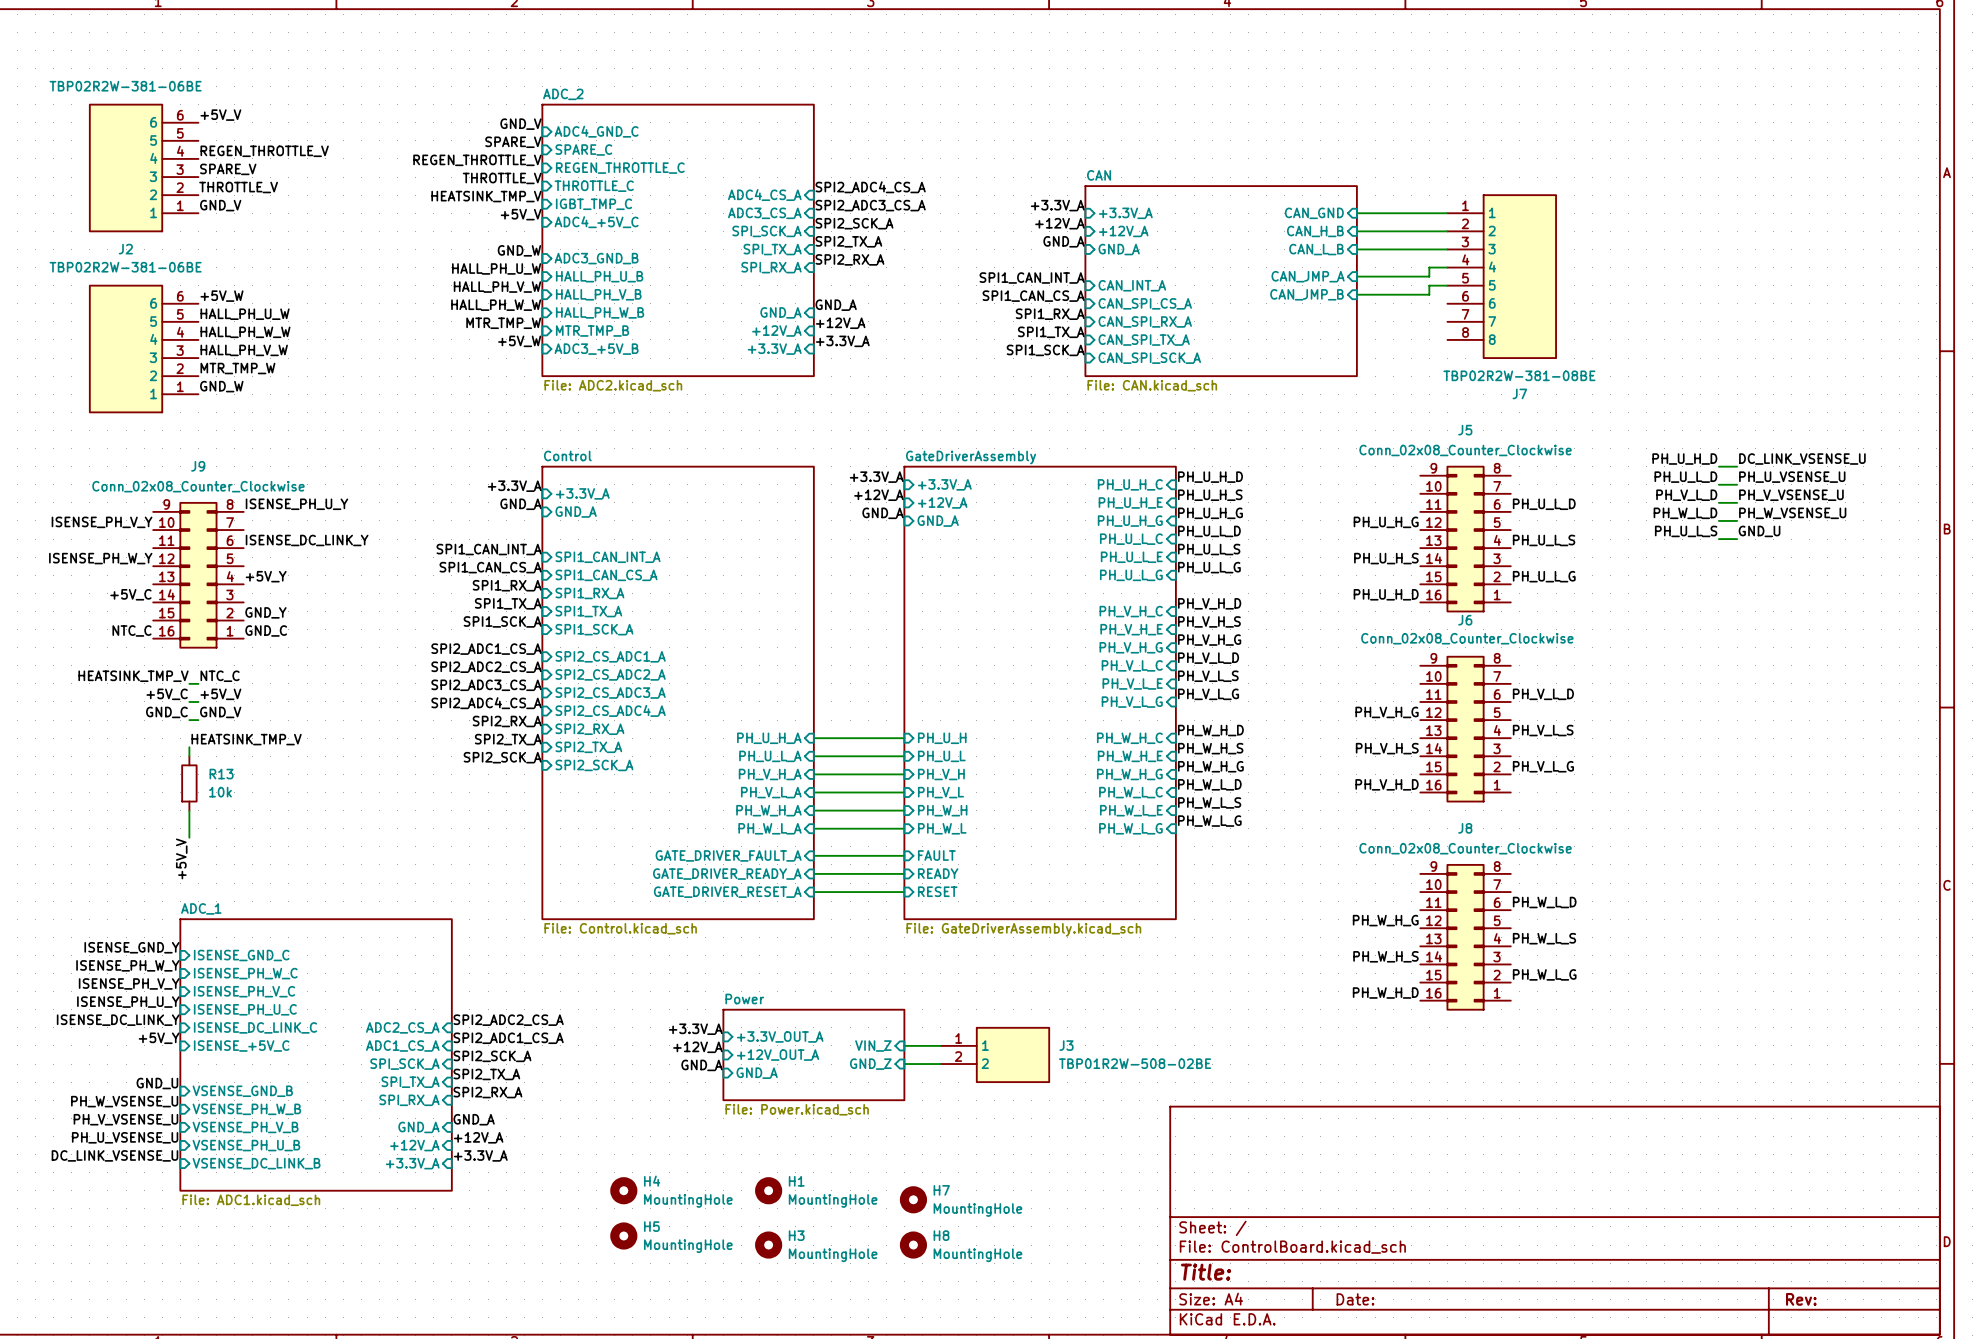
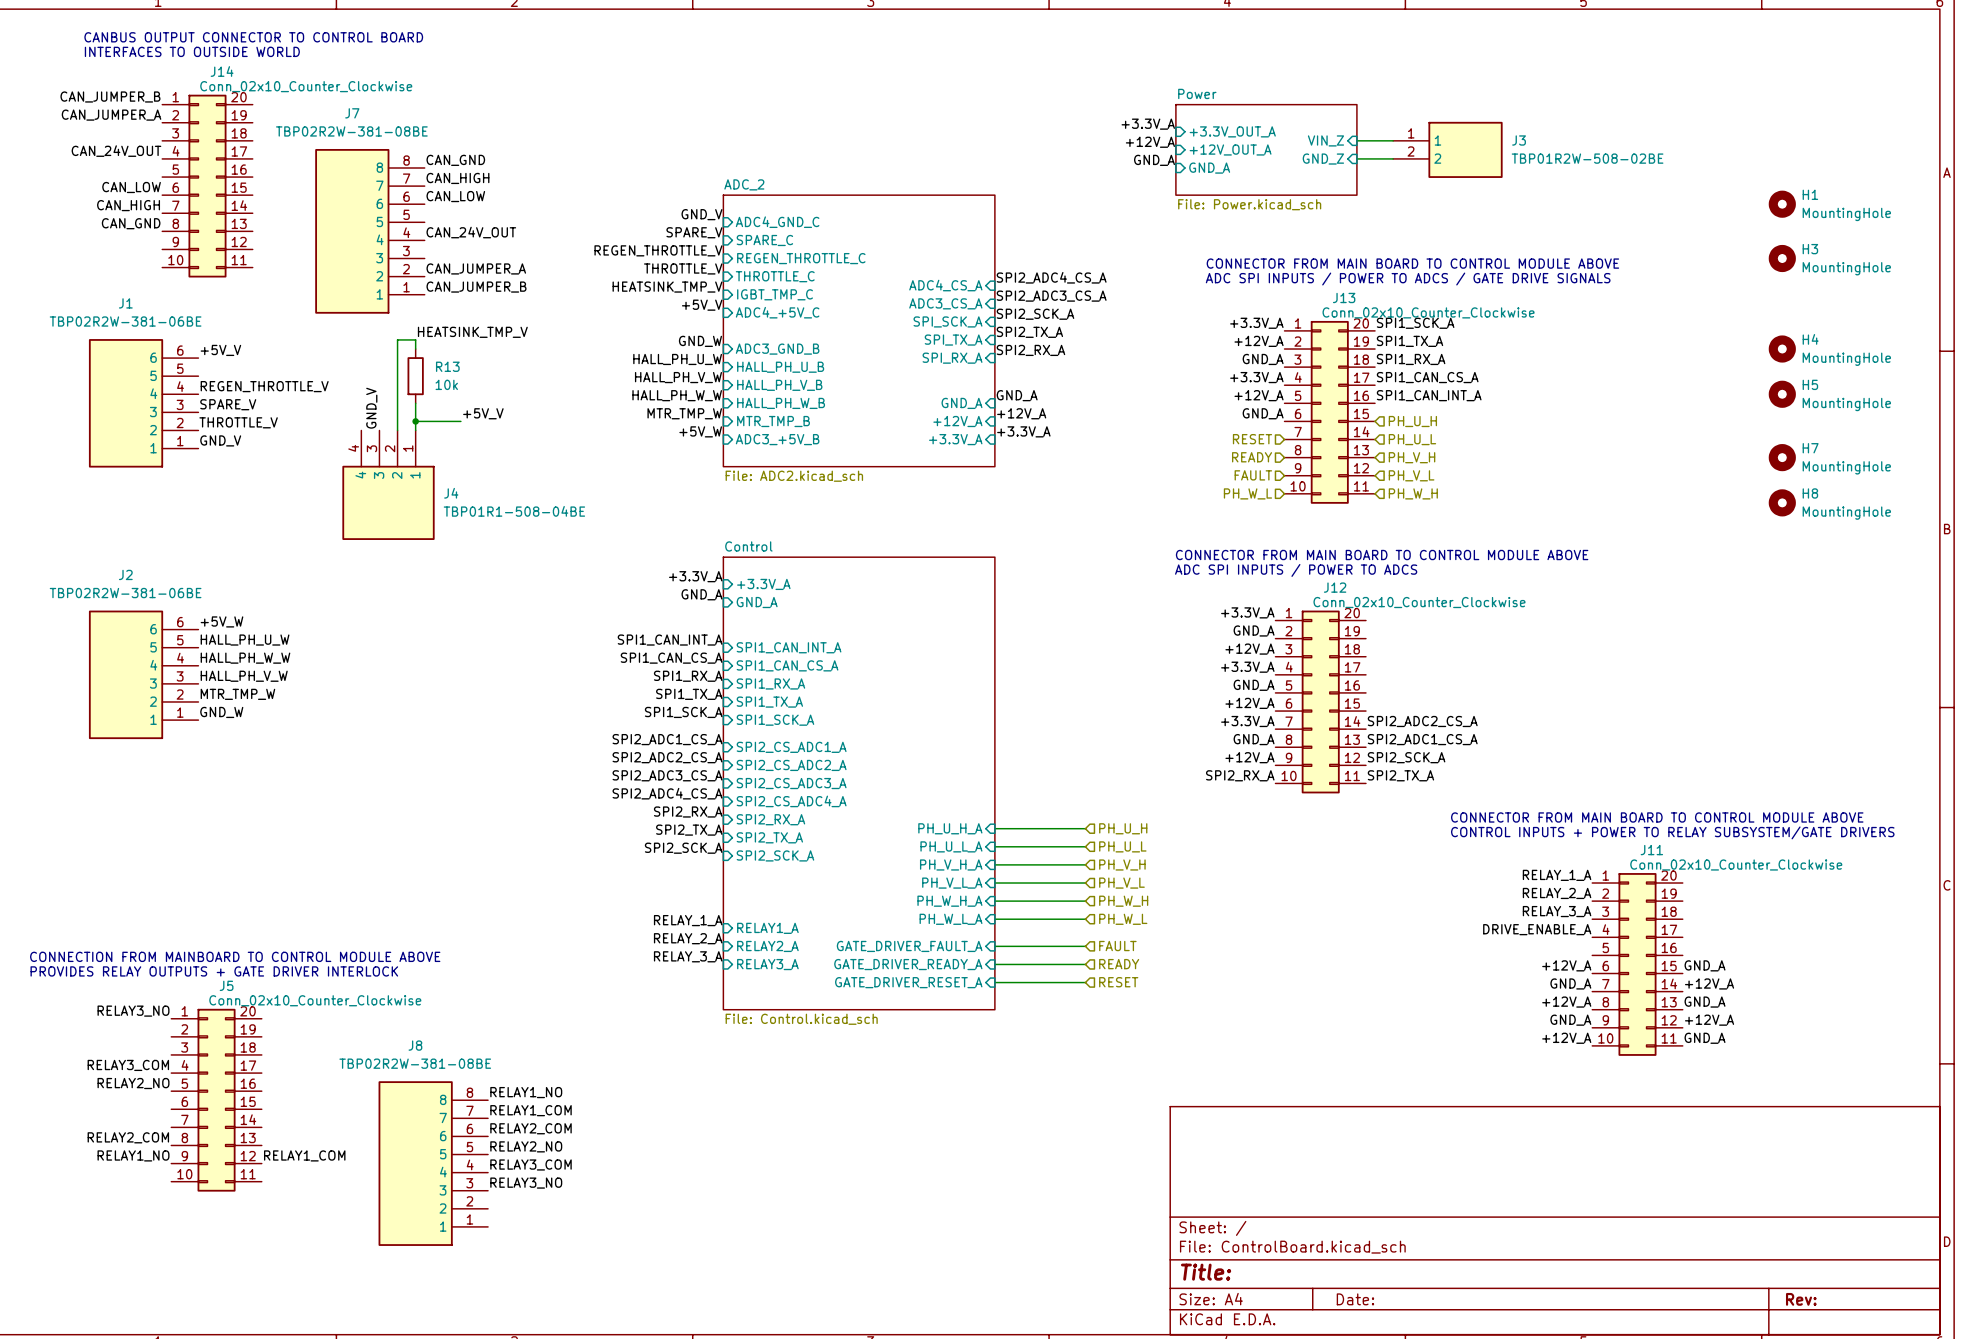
text: none -> CANBUS OUTPUT CONNECTOR TO CONTROL BOARD (253, 37)
text: none -> INTERFACES TO OUTSIDE WORLD (192, 51)
label: none -> CAN_JUMPER_B (110, 96)
label: none -> CAN_JUMPER_A (111, 115)
label: +5V_V (220, 115) -> none
label: GND_V (520, 124) -> none
label: none -> +3.3V_A (1148, 124)
sheet pin: ADC4_GND_C (596, 131) -> none
sheet pin: none -> +3.3V_OUT_A (1232, 131)
sheet pin: none -> VIN_Z (1325, 140)
wire: none -> (1356, 140) (1393, 140)
label: SPARE_V (513, 142) -> none
label: none -> +12V_A (1150, 142)
sheet pin: SPARE_C (583, 149) -> none
sheet pin: none -> +12V_OUT_A (1230, 149)
sheet Power: none -> File: Power.kicad_sch (1266, 149)
label: none -> CAN_24V_OUT (116, 151)
label: REGEN_THROTTLE_V (264, 151) -> none
wire: none -> (1356, 158) (1393, 158)
sheet pin: none -> GND_Z (1323, 159)
label: none -> CAN_GND (455, 160)
label: REGEN_THROTTLE_V (477, 160) -> none
label: none -> GND_A (1154, 160)
part: TBP02R2W-381-06BE (143, 167) -> none
sheet pin: REGEN_THROTTLE_C (620, 168) -> none
sheet pin: none -> GND_A (1209, 168)
label: SPARE_V (228, 169) -> none
label: none -> CAN_HIGH (457, 178)
label: THROTTLE_V (502, 178) -> none
J14: none -> Conn_02x10_Counter_Clockwise (207, 186)
sheet pin: THROTTLE_C (594, 186) -> none
label: none -> CAN_LOW (131, 187)
label: THROTTLE_V (238, 187) -> none
label: SPI2_ADC4_CS_A (870, 187) -> none
sheet pin: ADC4_CS_A (764, 195) -> none
label: none -> CAN_LOW (455, 196)
label: HEATSINK_TMP_V (486, 196) -> none
sheet pin: IGBT_TMP_C (594, 204) -> none
label: none -> CAN_HIGH (128, 205)
label: GND_V (220, 205) -> none
label: SPI2_ADC3_CS_A (870, 205) -> none
label: +3.3V_A (1057, 205) -> none
sheet pin: ADC3_CS_A (764, 213) -> none
sheet pin: +3.3V_A (1125, 213) -> none
sheet pin: CAN_GND (1314, 213) -> none
wire: (1356, 213) (1447, 213) -> none
label: +5V_V (521, 214) -> none
label: none -> GND_V (701, 214)
sheet pin: ADC4_+5V_C (596, 222) -> none
sheet pin: none -> ADC4_GND_C (777, 222)
label: none -> CAN_GND (131, 223)
label: SPI2_SCK_A (854, 223) -> none
label: +12V_A (1059, 223) -> none
sheet pin: SPI_SCK_A (766, 231) -> none
sheet pin: +12V_A (1123, 231) -> none
sheet pin: CAN_H_B (1315, 231) -> none
wire: (1356, 231) (1447, 231) -> none
label: none -> CAN_24V_OUT (471, 232)
label: none -> SPARE_V (694, 232)
sheet ADC_2 position: (678, 240) -> (859, 330)
sheet pin: none -> SPARE_C (764, 240)
label: SPI2_TX_A (848, 241) -> none
label: GND_A (1064, 241) -> none
sheet pin: SPI_TX_A (772, 249) -> none
sheet pin: GND_A (1119, 249) -> none
sheet pin: CAN_L_B (1316, 249) -> none
wire: (1356, 249) (1447, 249) -> none
label: GND_W (519, 250) -> none
label: none -> REGEN_THROTTLE_V (658, 250)
sheet pin: ADC3_GND_B (596, 258) -> none
sheet pin: none -> REGEN_THROTTLE_C (801, 258)
label: SPI2_RX_A (849, 259) -> none
text: none -> CONNECTOR FROM MAIN BOARD TO CONTROL MODULE ABOVE (1412, 263)
sheet pin: SPI_RX_A (771, 267) -> none
wire: (1447, 267) (1429, 267) (1429, 276) (1356, 276) -> none
label: none -> CAN_JUMPER_A (476, 268)
label: HALL_PH_U_W (496, 268) -> none
label: none -> THROTTLE_V (683, 268)
sheet pin: HALL_PH_U_B (599, 276) -> none
sheet pin: none -> THROTTLE_C (775, 276)
sheet pin: CAN_JMP_A (1308, 276) -> none
J7 position: (1502, 276) -> (369, 231)
J7 rotation: 0° (1519, 276) -> 180° (352, 231)
label: none -> SPI2_ADC4_CS_A (1051, 277)
label: SPI1_CAN_INT_A (1032, 278) -> none
text: none -> ADC SPI INPUTS / POWER TO ADCS / GATE DRIVE SIGNALS (1408, 279)
sheet CAN: File: CAN.kicad_sch (1221, 281) -> none
sheet pin: none -> ADC4_CS_A (945, 285)
sheet pin: CAN_INT_A (1132, 285) -> none
wire: (1447, 285) (1429, 285) (1429, 294) (1356, 294) -> none
label: none -> CAN_JUMPER_B (476, 287)
label: HALL_PH_V_W (497, 287) -> none
label: none -> HEATSINK_TMP_V (667, 287)
sheet pin: HALL_PH_V_B (598, 294) -> none
sheet pin: none -> IGBT_TMP_C (775, 294)
sheet pin: CAN_JMP_B (1307, 294) -> none
label: +5V_W (221, 296) -> none
label: SPI1_CAN_CS_A (1033, 296) -> none
label: none -> SPI2_ADC3_CS_A (1051, 296)
sheet pin: none -> ADC3_CS_A (945, 303)
sheet pin: CAN_SPI_CS_A (1145, 303) -> none
label: HALL_PH_W_W (496, 305) -> none
label: none -> +5V_V (702, 305)
label: GND_A (836, 305) -> none
sheet pin: HALL_PH_W_B (600, 312) -> none
sheet pin: none -> ADC4_+5V_C (777, 312)
sheet pin: GND_A (780, 312) -> none
label: HALL_PH_U_W (245, 314) -> none
label: none -> SPI2_SCK_A (1035, 314)
label: SPI1_RX_A (1050, 314) -> none
sheet pin: none -> SPI_SCK_A (947, 321)
sheet pin: CAN_SPI_RX_A (1145, 321) -> none
label: MTR_TMP_W (503, 323) -> none
label: +12V_A (840, 323) -> none
label: none -> +3.3V_A (1256, 323)
label: none -> SPI1_SCK_A (1415, 323)
sheet pin: MTR_TMP_B (592, 331) -> none
sheet pin: +12V_A (776, 331) -> none
label: HALL_PH_W_W (245, 332) -> none
label: none -> HEATSINK_TMP_V (472, 332)
label: none -> SPI2_TX_A (1029, 332)
label: SPI1_TX_A (1051, 332) -> none
sheet pin: none -> SPI_TX_A (953, 340)
sheet pin: CAN_SPI_TX_A (1144, 340) -> none
label: +5V_W (519, 341) -> none
label: none -> GND_W (700, 341)
label: +3.3V_A (842, 341) -> none
label: none -> +12V_A (1259, 341)
label: none -> SPI1_TX_A (1410, 341)
J2 position: (143, 349) -> (143, 674)
wire: none -> (415, 349) (415, 339) (397, 339) (397, 430)
sheet pin: ADC3_+5V_B (596, 349) -> none
sheet pin: +3.3V_A (774, 349) -> none
sheet pin: none -> ADC3_GND_B (777, 349)
label: HALL_PH_V_W (244, 350) -> +5V_V (220, 350)
label: none -> SPI2_RX_A (1030, 350)
label: SPI1_SCK_A (1045, 350) -> none
sheet pin: none -> SPI_RX_A (952, 358)
sheet pin: CAN_SPI_SCK_A (1149, 358) -> none
label: none -> HALL_PH_U_W (677, 359)
label: none -> GND_A (1263, 359)
label: none -> SPI1_RX_A (1411, 359)
sheet pin: none -> HALL_PH_U_B (780, 367)
label: MTR_TMP_W (237, 368) -> none
label: none -> HALL_PH_V_W (678, 377)
label: none -> +3.3V_A (1256, 377)
label: none -> SPI1_CAN_CS_A (1427, 377)
sheet pin: none -> HALL_PH_V_B (779, 385)
label: GND_W (221, 386) -> REGEN_THROTTLE_V (264, 386)
label: none -> HALL_PH_W_W (677, 395)
label: none -> GND_A (1017, 395)
label: none -> +12V_A (1259, 395)
label: none -> SPI1_CAN_INT_A (1429, 395)
J1: none -> TBP02R2W-381-06BE (143, 403)
wire: none -> (415, 403) (415, 430)
sheet pin: none -> HALL_PH_W_B (781, 403)
sheet pin: none -> GND_A (962, 403)
label: none -> SPARE_V (228, 404)
label: none -> GND_V (371, 408)
J13: none -> Conn_02x10_Counter_Clockwise (1329, 412)
label: none -> +5V_V (483, 413)
label: none -> MTR_TMP_W (684, 413)
label: none -> +12V_A (1021, 413)
label: none -> GND_A (1263, 413)
wire: none -> (415, 421) (460, 421)
junction: none -> (415, 421)
sheet pin: none -> MTR_TMP_B (773, 421)
sheet pin: none -> +12V_A (957, 421)
hierarchical label: none -> PH_U_H (1412, 421)
label: none -> THROTTLE_V (238, 422)
label: none -> +5V_W (700, 431)
label: none -> +3.3V_A (1023, 431)
sheet pin: none -> ADC3_+5V_B (777, 439)
hierarchical label: none -> RESET (1252, 439)
hierarchical label: none -> PH_U_L (1412, 439)
label: none -> GND_V (220, 440)
J5 value: Conn_02x08_Counter_Clockwise (1465, 450) -> Conn_02x10_Counter_Clockwise (315, 1000)
hierarchical label: none -> READY (1252, 457)
hierarchical label: none -> PH_V_H (1412, 457)
label: PH_U_H_D (1684, 459) -> none
label: DC_LINK_VSENSE_U (1802, 459) -> none
J5 symbol: [1420, 465, 1511, 613] -> [171, 1008, 262, 1192]
wire: (1718, 466) (1737, 466) -> none
hierarchical label: none -> FAULT (1253, 475)
hierarchical label: none -> PH_V_L (1411, 475)
label: +3.3V_A (876, 477) -> none
label: PH_U_H_D (1210, 477) -> none
label: PH_U_L_D (1685, 477) -> none
label: PH_U_VSENSE_U (1792, 477) -> none
sheet pin rotation: 0° (944, 484) -> 180° (955, 439)
sheet pin: PH_U_H_C (1130, 484) -> none
wire: (1718, 484) (1737, 484) -> none
J4: none -> TBP01R1-508-04BE (388, 485)
label: +3.3V_A (514, 486) -> none
sheet pin: +3.3V_A (582, 493) -> none
hierarchical label: none -> PH_W_L (1247, 493)
hierarchical label: none -> PH_W_H (1413, 493)
label: +12V_A (878, 495) -> none
label: PH_U_H_S (1210, 495) -> none
label: PH_V_L_D (1686, 495) -> none
label: PH_V_VSENSE_U (1791, 495) -> none
sheet pin: +12V_A (942, 502) -> none
sheet pin: PH_U_H_E (1130, 502) -> none
wire: (1718, 502) (1737, 502) -> none
label: ISENSE_PH_U_Y (296, 504) -> none
label: GND_A (520, 504) -> none
label: PH_U_L_D (1544, 504) -> none
sheet pin: GND_A (576, 512) -> none
label: GND_A (882, 513) -> none
label: PH_U_H_G (1210, 513) -> none
label: PH_W_L_D (1685, 513) -> none
label: PH_W_VSENSE_U (1792, 513) -> none
wire: (1718, 520) (1737, 520) -> none
sheet pin: GND_A (938, 521) -> none
sheet pin: PH_U_H_G (1130, 521) -> none
label: ISENSE_PH_V_Y (102, 522) -> none
label: PH_U_H_G (1386, 522) -> none
label: PH_U_L_D (1209, 531) -> none
label: PH_U_L_S (1686, 531) -> none
label: GND_U (1759, 531) -> none
sheet pin: PH_U_L_C (1131, 539) -> none
wire: (1718, 539) (1737, 539) -> none
label: ISENSE_DC_LINK_Y (307, 540) -> none
label: PH_U_L_S (1544, 540) -> none
label: SPI1_CAN_INT_A (489, 549) -> none
label: PH_U_L_S (1209, 549) -> none
text: none -> CONNECTOR FROM MAIN BOARD TO CONTROL MODULE ABOVE (1382, 555)
sheet pin: SPI1_CAN_INT_A (608, 557) -> none
sheet pin: PH_U_L_E (1131, 557) -> none
label: ISENSE_PH_W_Y (100, 558) -> none
label: PH_U_H_S (1386, 558) -> none
label: SPI1_CAN_CS_A (490, 567) -> none
label: PH_U_L_G (1209, 567) -> none
text: none -> ADC SPI INPUTS / POWER TO ADCS (1296, 570)
J9: Conn_02x08_Counter_Clockwise (198, 575) -> none
sheet pin: SPI1_CAN_CS_A (606, 575) -> none
sheet pin: PH_U_L_G (1131, 575) -> none
label: +5V_Y (266, 576) -> none
label: none -> +3.3V_A (695, 576)
label: PH_U_L_G (1544, 576) -> none
sheet pin: none -> +3.3V_A (763, 584)
label: SPI1_RX_A (507, 585) -> none
sheet pin: SPI1_RX_A (589, 593) -> none
label: +5V_C (130, 594) -> none
label: none -> GND_A (701, 594)
label: PH_U_H_D (1386, 594) -> none
sheet pin: none -> GND_A (757, 602)
label: SPI1_TX_A (508, 603) -> none
label: PH_V_H_D (1209, 603) -> none
sheet pin: SPI1_TX_A (588, 611) -> none
sheet pin: PH_V_H_C (1131, 611) -> none
label: GND_Y (265, 612) -> none
label: none -> +3.3V_A (1247, 612)
label: none -> +5V_W (221, 621)
label: SPI1_SCK_A (502, 621) -> none
label: PH_V_H_S (1209, 621) -> none
sheet pin: SPI1_SCK_A (594, 629) -> none
sheet pin: PH_V_H_E (1131, 629) -> none
label: NTC_C (131, 630) -> none
label: GND_C (266, 630) -> none
label: none -> GND_A (1254, 630)
label: none -> HALL_PH_U_W (245, 640)
label: none -> SPI1_CAN_INT_A (670, 640)
label: PH_V_H_G (1209, 640) -> none
sheet pin: none -> SPI1_CAN_INT_A (789, 647)
sheet pin: PH_V_H_G (1131, 647) -> none
label: SPI2_ADC1_CS_A (486, 649) -> none
label: none -> +12V_A (1249, 649)
sheet pin: SPI2_CS_ADC1_A (610, 656) -> none
label: none -> HALL_PH_W_W (245, 658)
label: none -> SPI1_CAN_CS_A (671, 658)
label: PH_V_L_D (1208, 658) -> none
sheet pin: none -> SPI1_CAN_CS_A (787, 665)
sheet pin: PH_V_L_C (1132, 665) -> none
label: SPI2_ADC2_CS_A (486, 667) -> none
label: none -> +3.3V_A (1247, 667)
sheet pin: SPI2_CS_ADC2_A (610, 674) -> none
label: HEATSINK_TMP_V (133, 676) -> none
label: NTC_C (220, 676) -> HALL_PH_V_W (244, 676)
label: none -> SPI1_RX_A (688, 676)
label: PH_V_L_S (1208, 676) -> none
sheet pin: none -> SPI1_RX_A (770, 683)
sheet pin: PH_V_L_E (1132, 683) -> none
label: SPI2_ADC3_CS_A (486, 685) -> none
label: none -> GND_A (1254, 685)
sheet Control: File: Control.kicad_sch (678, 692) -> none
sheet GateDriverAssembly: File: GateDriverAssembly.kicad_sch (1040, 692) -> none
sheet pin: SPI2_CS_ADC3_A (610, 693) -> none
label: +5V_C (167, 694) -> none
label: +5V_V (220, 694) -> MTR_TMP_W (237, 694)
label: none -> SPI1_TX_A (689, 694)
label: PH_V_L_G (1208, 694) -> none
label: PH_V_L_D (1543, 694) -> none
J12: none -> Conn_02x10_Counter_Clockwise (1320, 701)
sheet pin: none -> SPI1_TX_A (769, 702)
sheet pin: PH_V_L_G (1132, 702) -> none
label: SPI2_ADC4_CS_A (486, 703) -> none
label: none -> +12V_A (1249, 703)
sheet pin: SPI2_CS_ADC4_A (610, 710) -> none
label: GND_C (166, 712) -> none
label: GND_V (220, 712) -> GND_W (221, 712)
label: none -> SPI1_SCK_A (683, 712)
label: PH_V_H_G (1387, 712) -> none
sheet pin: none -> SPI1_SCK_A (775, 720)
label: SPI2_RX_A (507, 721) -> none
label: none -> +3.3V_A (1247, 721)
label: none -> SPI2_ADC2_CS_A (1422, 721)
sheet pin: SPI2_RX_A (589, 729) -> none
J6: Conn_02x08_Counter_Clockwise (1465, 729) -> none
label: PH_W_H_D (1210, 730) -> none
label: PH_V_L_S (1543, 730) -> none
sheet pin: PH_U_H_A (769, 738) -> none
wire: (813, 738) (904, 738) -> none
sheet pin: PH_U_H (942, 738) -> none
sheet pin: PH_W_H_C (1129, 738) -> none
label: HEATSINK_TMP_V (246, 739) -> none
label: SPI2_TX_A (508, 739) -> none
label: none -> SPI2_ADC1_CS_A (667, 739)
label: none -> GND_A (1254, 739)
label: none -> SPI2_ADC1_CS_A (1422, 739)
wire: (189, 747) (189, 756) -> none
sheet pin: SPI2_TX_A (588, 747) -> none
sheet pin: none -> SPI2_CS_ADC1_A (791, 747)
label: PH_W_H_S (1210, 748) -> none
label: PH_V_H_S (1387, 748) -> none
sheet pin: PH_U_L_A (770, 756) -> none
wire: (813, 756) (904, 756) -> none
sheet pin: PH_U_L (941, 756) -> none
sheet pin: PH_W_H_E (1130, 756) -> none
label: SPI2_SCK_A (502, 757) -> none
label: none -> SPI2_ADC2_CS_A (667, 757)
label: none -> +12V_A (1249, 757)
label: none -> SPI2_SCK_A (1406, 757)
sheet pin: SPI2_SCK_A (594, 765) -> none
sheet pin: none -> SPI2_CS_ADC2_A (791, 765)
label: PH_W_H_G (1210, 766) -> none
label: PH_V_L_G (1543, 766) -> none
sheet pin: PH_V_H_A (770, 774) -> none
wire: (813, 774) (904, 774) -> none
sheet pin: PH_V_H (941, 774) -> none
sheet pin: PH_W_H_G (1129, 774) -> none
label: none -> SPI2_ADC3_CS_A (667, 775)
label: none -> SPI2_RX_A (1240, 775)
label: none -> SPI2_TX_A (1400, 775)
R13 position: (189, 783) -> (415, 376)
sheet pin: none -> SPI2_CS_ADC3_A (791, 783)
sheet Control: none -> File: Control.kicad_sch (859, 783)
label: PH_W_L_D (1209, 784) -> none
label: PH_V_H_D (1387, 784) -> none
sheet pin: PH_V_L_A (771, 792) -> none
wire: (813, 792) (904, 792) -> none
sheet pin: PH_V_L (940, 792) -> none
sheet pin: PH_W_L_C (1130, 792) -> none
label: none -> SPI2_ADC4_CS_A (667, 793)
sheet pin: none -> SPI2_CS_ADC4_A (791, 801)
label: PH_W_L_S (1209, 802) -> none
wire: (189, 810) (189, 837) -> none
sheet pin: PH_W_H_A (768, 810) -> none
wire: (813, 810) (904, 810) -> none
sheet pin: PH_W_H (942, 810) -> PH_U_H_A (950, 828)
sheet pin: PH_W_L_E (1131, 810) -> none
label: none -> SPI2_RX_A (688, 812)
text: none -> CONNECTOR FROM MAIN BOARD TO CONTROL MODULE ABOVE (1657, 817)
sheet pin: none -> SPI2_RX_A (770, 819)
label: PH_W_L_G (1209, 821) -> none
sheet pin: PH_W_L_A (770, 828) -> none
wire: (813, 828) (904, 828) -> none
sheet pin: PH_W_L (942, 828) -> PH_U_L_A (951, 846)
wire: none -> (994, 828) (1085, 828)
hierarchical label: none -> PH_U_H (1123, 828)
sheet pin: PH_W_L_G (1130, 828) -> none
J8 name position: J8 (1465, 828) -> J8 (415, 1045)
label: none -> SPI2_TX_A (689, 830)
text: none -> CONTROL INPUTS + POWER TO RELAY SUBSYSTEM/GATE DRIVERS (1672, 832)
sheet pin: none -> SPI2_TX_A (769, 837)
wire: none -> (994, 846) (1085, 846)
hierarchical label: none -> PH_U_L (1122, 846)
label: none -> SPI2_SCK_A (683, 848)
J8 value: Conn_02x08_Counter_Clockwise (1465, 848) -> TBP02R2W-381-08BE (415, 1063)
sheet pin: GATE_DRIVER_FAULT_A (728, 855) -> none
sheet pin: none -> SPI2_SCK_A (775, 855)
wire: (813, 855) (904, 855) -> none
sheet pin: FAULT (936, 855) -> none
label: +5V_V (181, 858) -> none
J8 symbol: [1420, 863, 1511, 1011] -> [378, 1081, 489, 1246]
sheet pin: none -> PH_V_H_A (951, 864)
wire: none -> (994, 864) (1085, 864)
hierarchical label: none -> PH_V_H (1122, 864)
wire: (813, 873) (904, 873) -> none
sheet pin: READY (938, 873) -> none
sheet pin: GATE_DRIVER_READY_A (727, 874) -> none
label: none -> RELAY_1_A (1557, 875)
sheet pin: none -> PH_V_L_A (952, 883)
wire: none -> (994, 883) (1085, 883)
hierarchical label: none -> PH_V_L (1121, 883)
sheet pin: RESET (937, 891) -> none
sheet pin: GATE_DRIVER_RESET_A (727, 892) -> none
wire: (813, 892) (904, 892) -> none
label: none -> RELAY_2_A (1557, 893)
sheet pin: none -> PH_W_H_A (949, 901)
wire: none -> (994, 901) (1085, 901)
hierarchical label: none -> PH_W_H (1123, 901)
label: PH_W_L_D (1544, 902) -> none
label: none -> RELAY_3_A (1557, 911)
sheet pin: none -> PH_W_L_A (951, 919)
hierarchical label: none -> PH_W_L (1123, 919)
label: none -> RELAY_1_A (688, 920)
label: PH_W_H_G (1385, 920) -> none
sheet pin: none -> RELAY1_A (767, 928)
label: none -> DRIVE_ENABLE_A (1537, 929)
label: none -> RELAY_2_A (688, 938)
label: PH_W_L_S (1544, 938) -> none
sheet pin: none -> RELAY2_A (767, 946)
sheet pin: none -> GATE_DRIVER_FAULT_A (909, 946)
wire: none -> (994, 946) (1085, 946)
hierarchical label: none -> FAULT (1117, 946)
label: ISENSE_GND_Y (131, 947) -> none
sheet pin: ISENSE_GND_C (241, 955) -> none
text: none -> CONNECTION FROM MAINBOARD TO CONTROL MODULE ABOVE (235, 956)
label: none -> RELAY_3_A (688, 956)
label: PH_W_H_S (1385, 956) -> none
sheet pin: none -> RELAY3_A (767, 964)
sheet pin: none -> GATE_DRIVER_READY_A (908, 964)
wire: none -> (994, 964) (1085, 964)
hierarchical label: none -> READY (1119, 964)
J11: none -> Conn_02x10_Counter_Clockwise (1637, 964)
label: ISENSE_PH_W_Y (127, 965) -> none
label: none -> +12V_A (1566, 965)
label: none -> GND_A (1705, 965)
text: none -> PROVIDES RELAY OUTPUTS + GATE DRIVER INTERLOCK (214, 971)
sheet pin: ISENSE_PH_W_C (245, 973) -> none
label: PH_W_L_G (1544, 974) -> none
sheet pin: none -> GATE_DRIVER_RESET_A (908, 982)
wire: none -> (994, 982) (1085, 982)
hierarchical label: none -> RESET (1118, 982)
label: ISENSE_PH_V_Y (129, 983) -> none
label: none -> GND_A (1570, 983)
label: none -> +12V_A (1709, 983)
sheet pin: ISENSE_PH_V_C (244, 991) -> none
label: PH_W_H_D (1385, 993) -> none
label: ISENSE_PH_U_Y (128, 1002) -> none
label: none -> +12V_A (1566, 1002)
label: none -> GND_A (1705, 1002)
sheet pin: ISENSE_PH_U_C (245, 1009) -> none
label: none -> RELAY3_NO (133, 1011)
label: ISENSE_DC_LINK_Y (118, 1020) -> none
label: SPI2_ADC2_CS_A (508, 1020) -> none
label: none -> GND_A (1570, 1020)
label: none -> +12V_A (1709, 1020)
sheet pin: ISENSE_DC_LINK_C (255, 1027) -> none
sheet pin: ADC2_CS_A (402, 1027) -> none
label: +3.3V_A (695, 1029) -> none
sheet pin: +3.3V_OUT_A (780, 1036) -> none
label: +5V_Y (159, 1038) -> none
label: SPI2_ADC1_CS_A (508, 1038) -> none
label: none -> +12V_A (1566, 1038)
label: none -> GND_A (1705, 1038)
wire: (904, 1045) (940, 1045) -> none
sheet pin: ISENSE_+5V_C (241, 1046) -> none
sheet pin: ADC1_CS_A (402, 1046) -> none
sheet pin: VIN_Z (873, 1046) -> none
label: +12V_A (697, 1047) -> none
sheet ADC_1: File: ADC1.kicad_sch (316, 1054) -> none
sheet Power: File: Power.kicad_sch (813, 1054) -> none
J3 position: (995, 1054) -> (1447, 149)
sheet pin: +12V_OUT_A (778, 1055) -> none
label: SPI2_SCK_A (492, 1056) -> none
sheet pin: SPI_SCK_A (404, 1064) -> none
sheet pin: GND_Z (870, 1064) -> none
wire: (904, 1064) (940, 1064) -> none
label: none -> RELAY3_COM (128, 1065)
label: GND_A (701, 1065) -> none
sheet pin: GND_A (757, 1073) -> none
label: SPI2_TX_A (486, 1074) -> none
sheet pin: SPI_TX_A (410, 1082) -> none
label: none -> RELAY2_NO (133, 1083)
label: GND_U (157, 1083) -> none
sheet pin: VSENSE_GND_B (242, 1091) -> none
label: SPI2_RX_A (487, 1092) -> none
label: none -> RELAY1_NO (526, 1092)
sheet pin: SPI_RX_A (409, 1100) -> none
label: PH_W_VSENSE_U (124, 1101) -> none
sheet pin: VSENSE_PH_W_B (246, 1109) -> none
label: none -> RELAY1_COM (531, 1110)
label: PH_V_VSENSE_U (125, 1119) -> none
label: GND_A (474, 1119) -> none
sheet pin: VSENSE_PH_V_B (245, 1127) -> none
sheet pin: GND_A (418, 1127) -> none
label: none -> RELAY2_COM (531, 1128)
label: PH_U_VSENSE_U (125, 1137) -> none
label: none -> RELAY2_COM (128, 1137)
label: +12V_A (478, 1137) -> none
sheet pin: VSENSE_PH_U_B (246, 1145) -> none
sheet pin: +12V_A (414, 1145) -> none
label: none -> RELAY2_NO (526, 1146)
label: DC_LINK_VSENSE_U (114, 1155) -> none
label: none -> RELAY1_NO (133, 1155)
label: none -> RELAY1_COM (304, 1155)
label: +3.3V_A (480, 1155) -> none
sheet pin: VSENSE_DC_LINK_B (256, 1163) -> none
sheet pin: +3.3V_A (412, 1163) -> none
label: none -> RELAY3_COM (531, 1164)
label: none -> RELAY3_NO (526, 1183)
H4 position: (623, 1190) -> (1782, 349)
H1 position: (768, 1190) -> (1782, 204)
H7 position: (913, 1199) -> (1782, 457)
H5 position: (623, 1235) -> (1782, 394)
H3 position: (768, 1245) -> (1782, 258)
H8 position: (913, 1245) -> (1782, 502)

